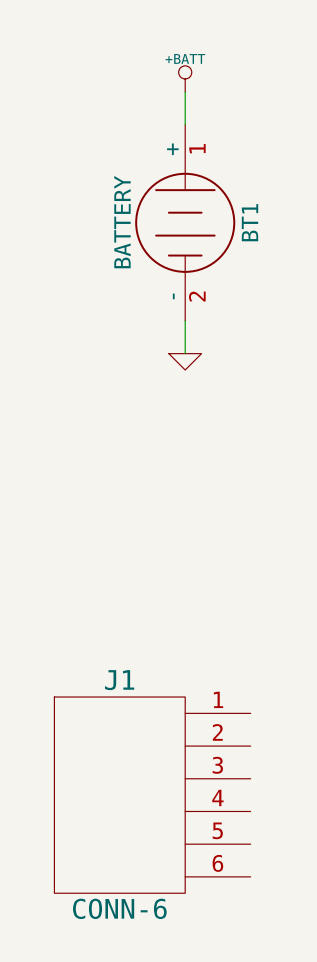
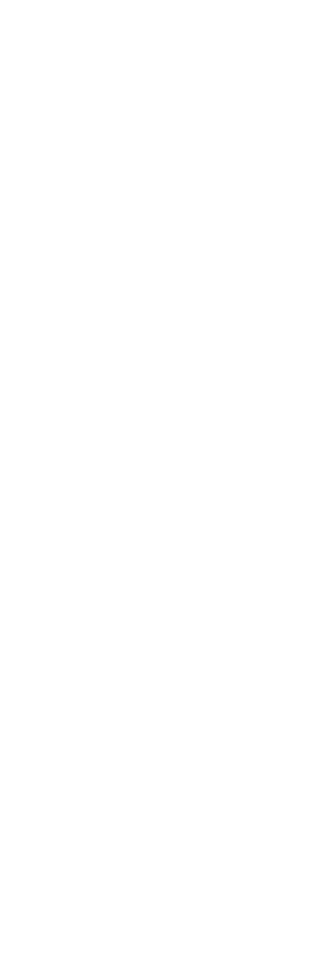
power symbol: +BATT (185, 78) -> none
wire: (185, 92) (185, 124) -> none
BT1: BATTERY (185, 222) -> none
wire: (185, 320) (185, 353) -> none
power symbol: (185, 361) -> none
J1: CONN-6 (152, 795) -> none

